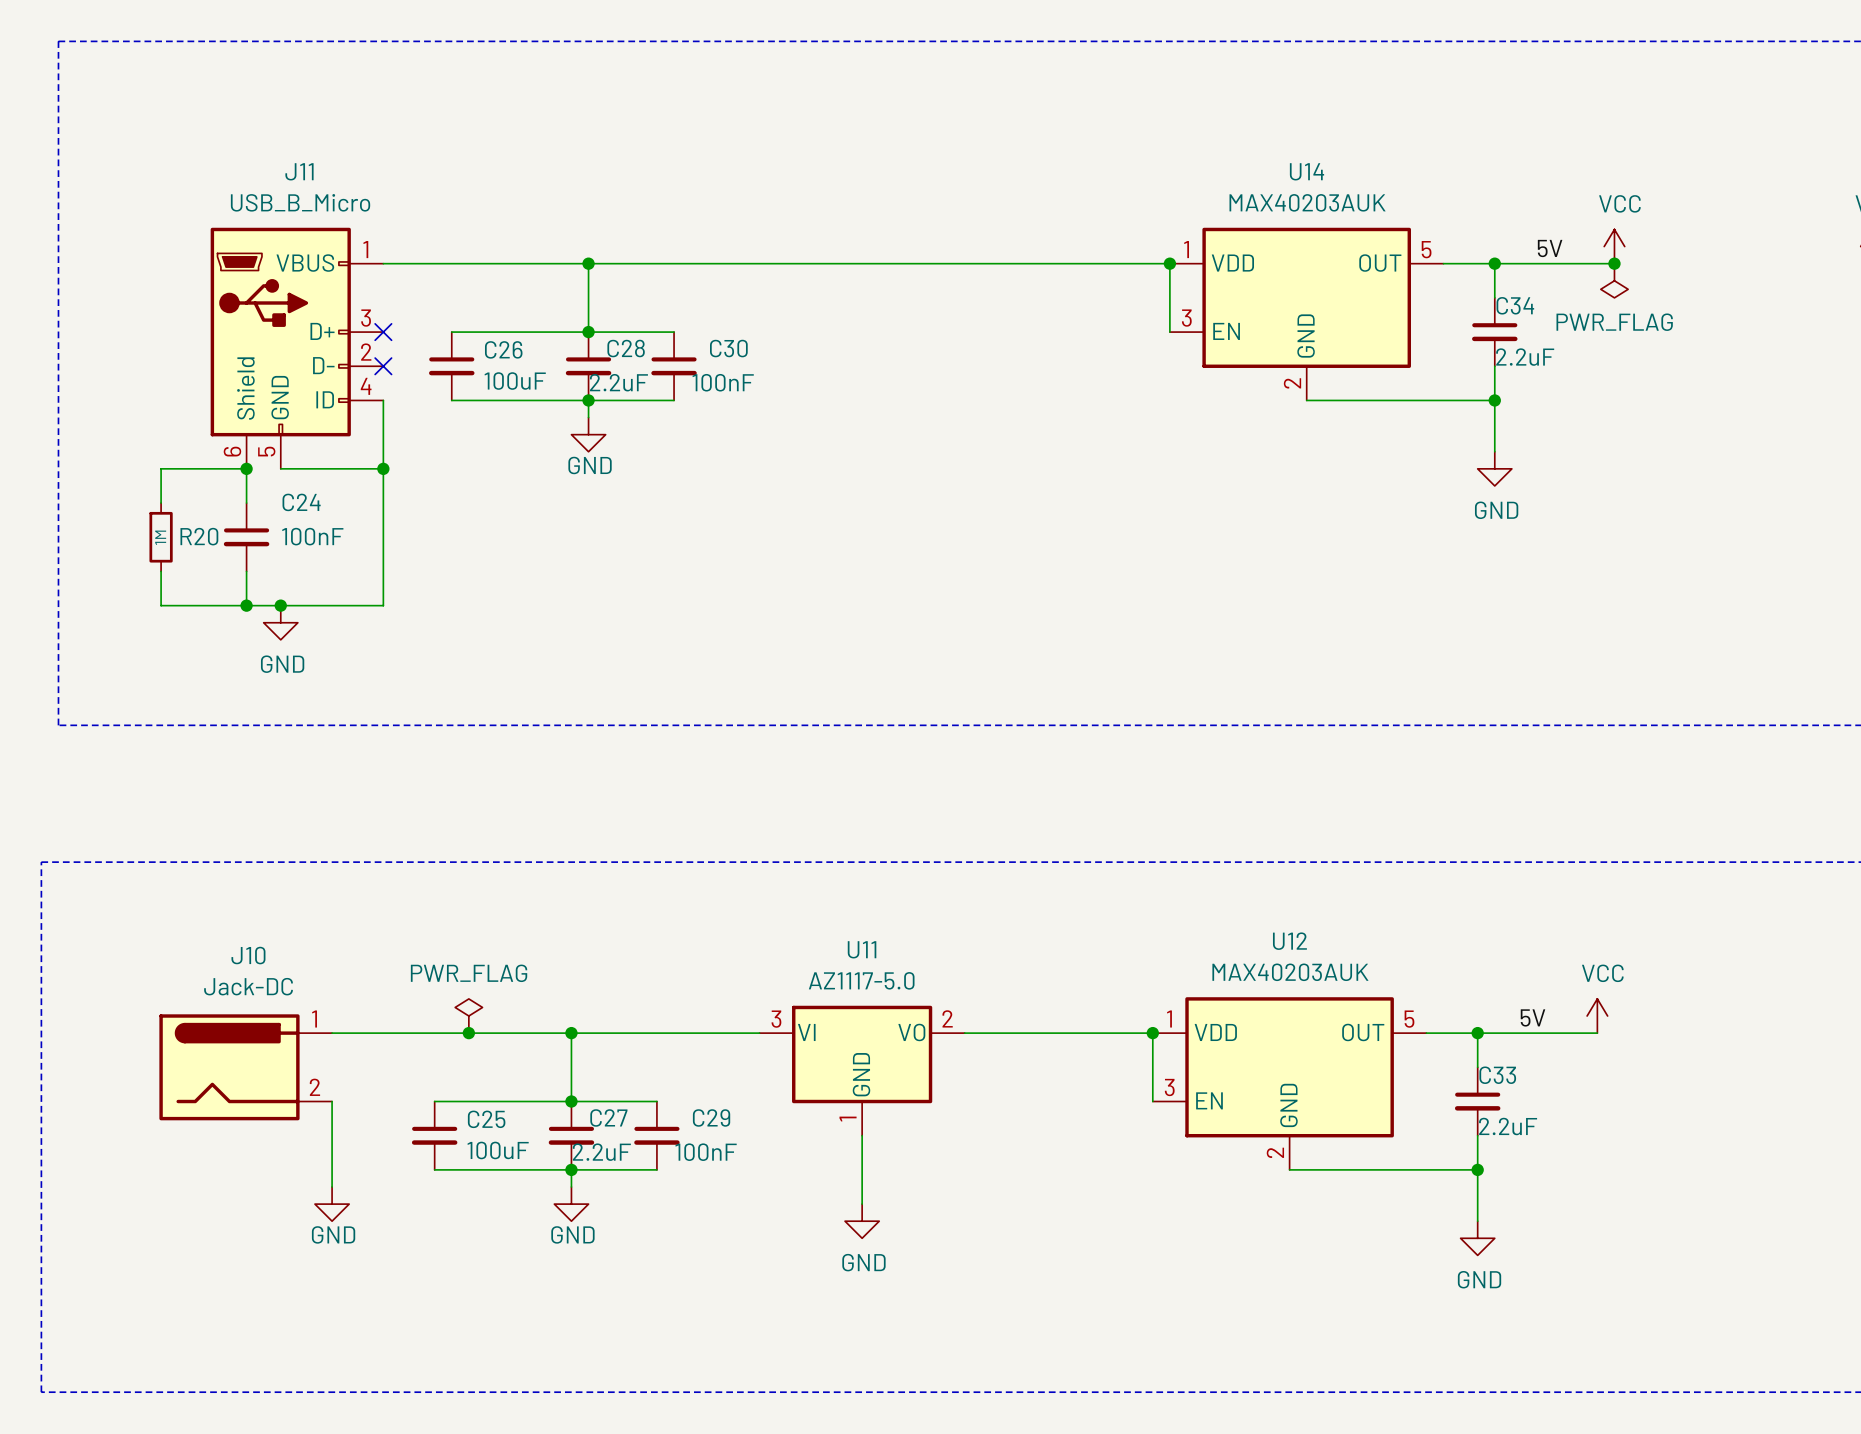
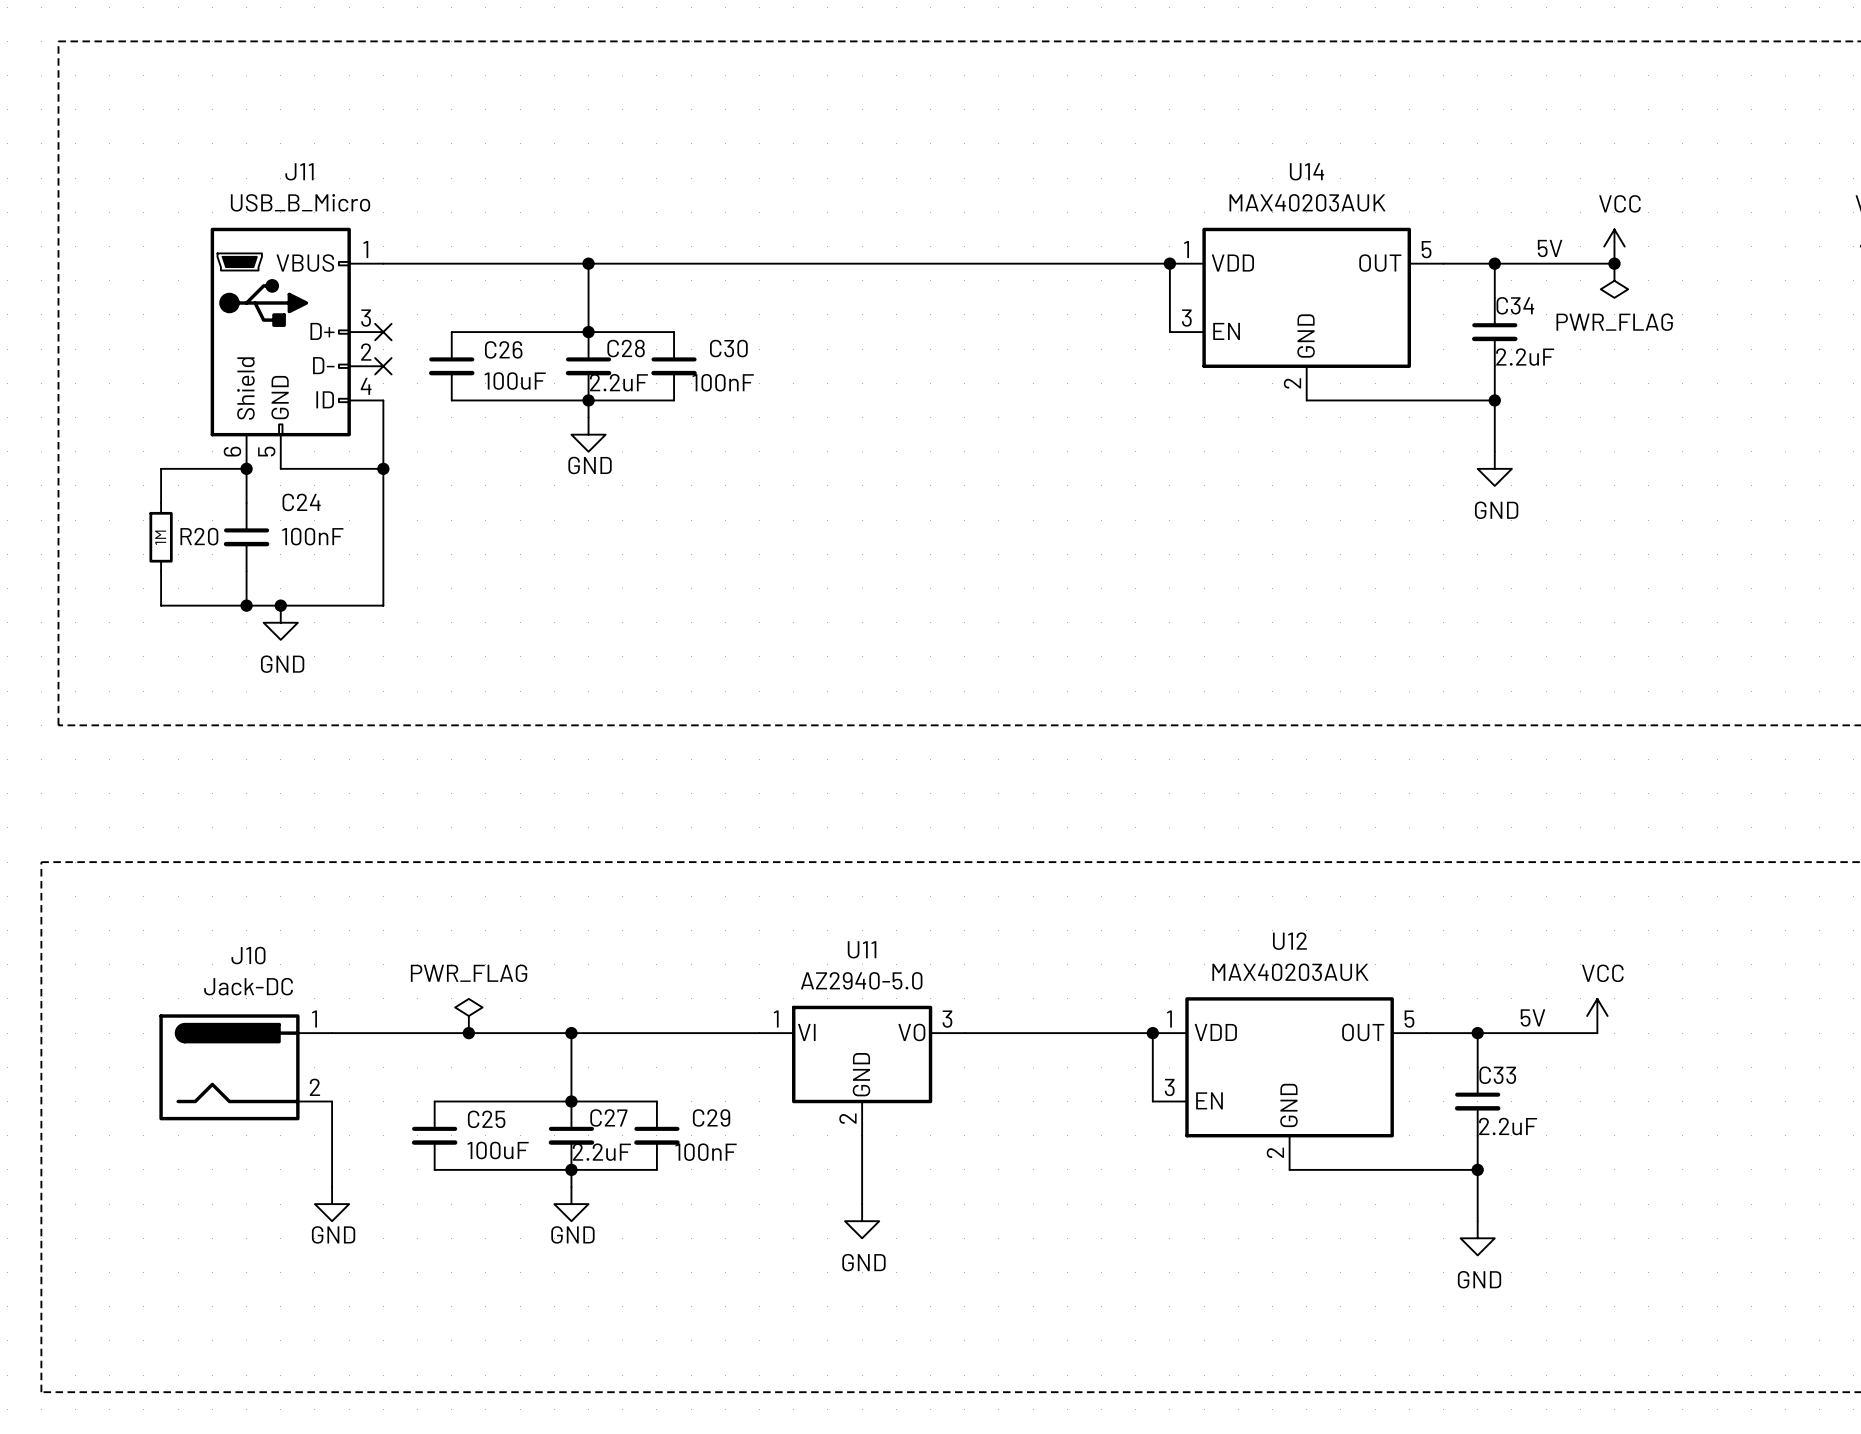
U11 value: AZ1117-5.0 (861, 980) -> AZ2940-5.0 (861, 980)
U11 pin number: 2 (947, 1018) -> 3 (947, 1019)
U11 pin number: 3 (776, 1019) -> 1 (776, 1019)
U11 pin number: 1 (848, 1119) -> 2 (847, 1118)

